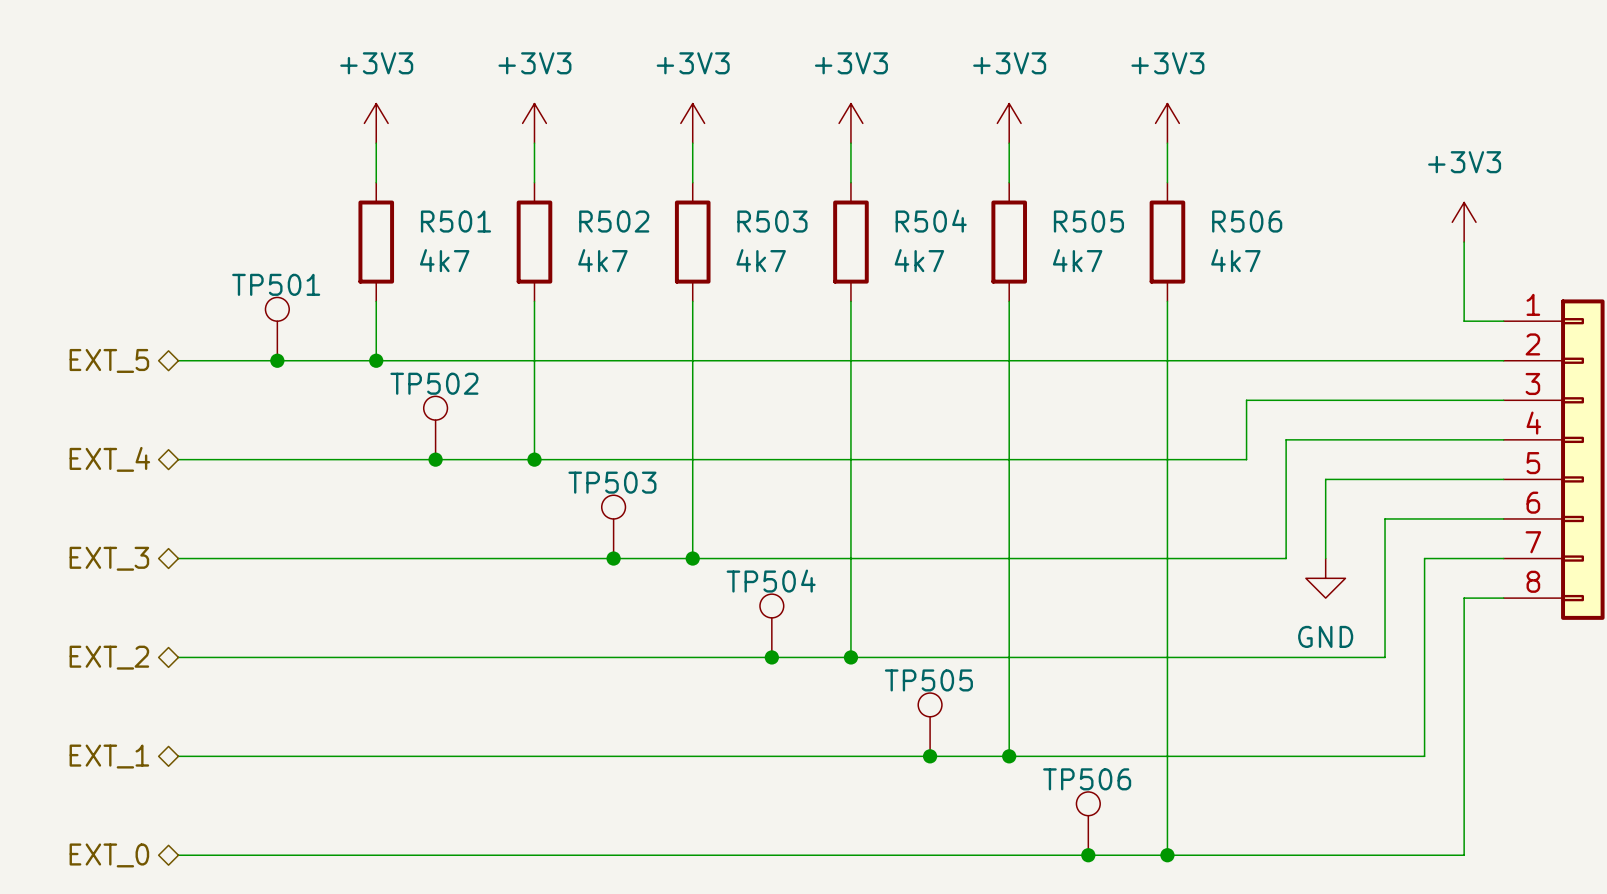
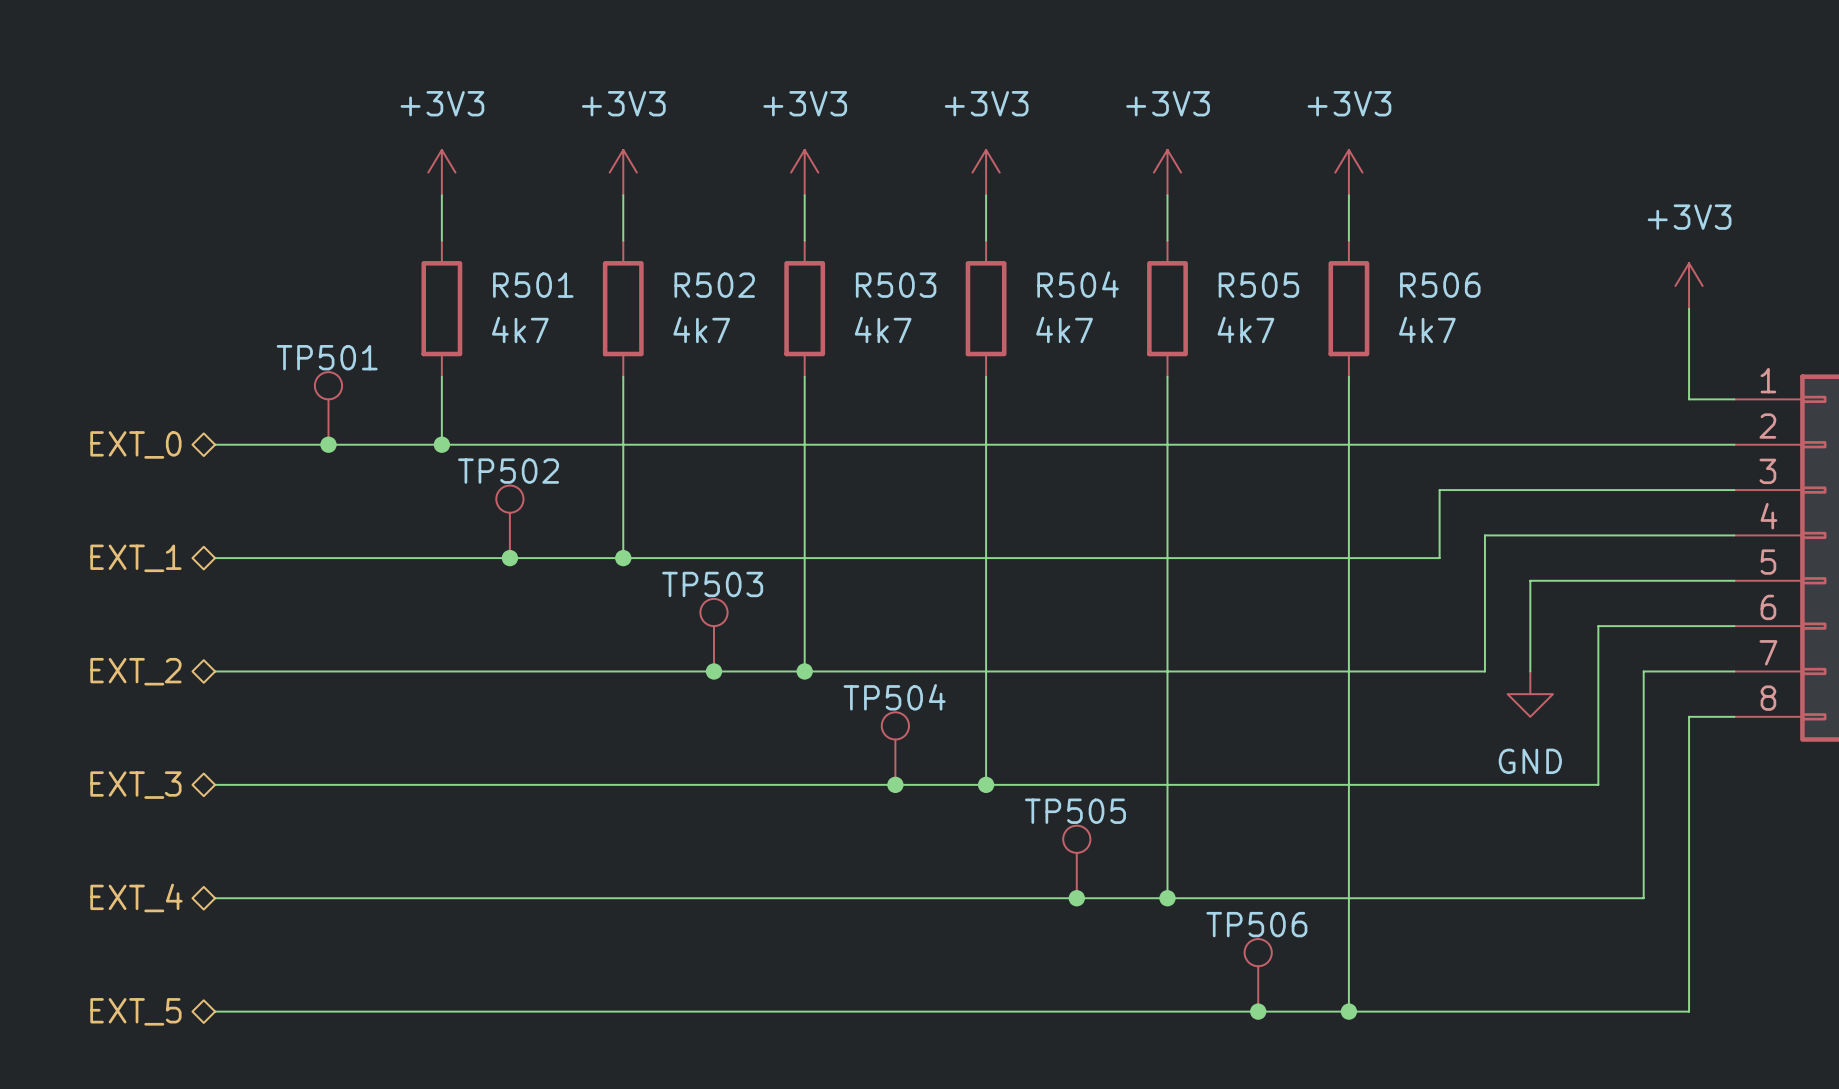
hierarchical label: EXT_5 (109, 360) -> EXT_0 (135, 444)
hierarchical label: EXT_4 (109, 459) -> EXT_1 (135, 558)
hierarchical label: EXT_3 (109, 558) -> EXT_2 (135, 671)
hierarchical label: EXT_2 (109, 657) -> EXT_3 (135, 785)
hierarchical label: EXT_1 (109, 756) -> EXT_4 (136, 897)
hierarchical label: EXT_0 (109, 855) -> EXT_5 (135, 1011)

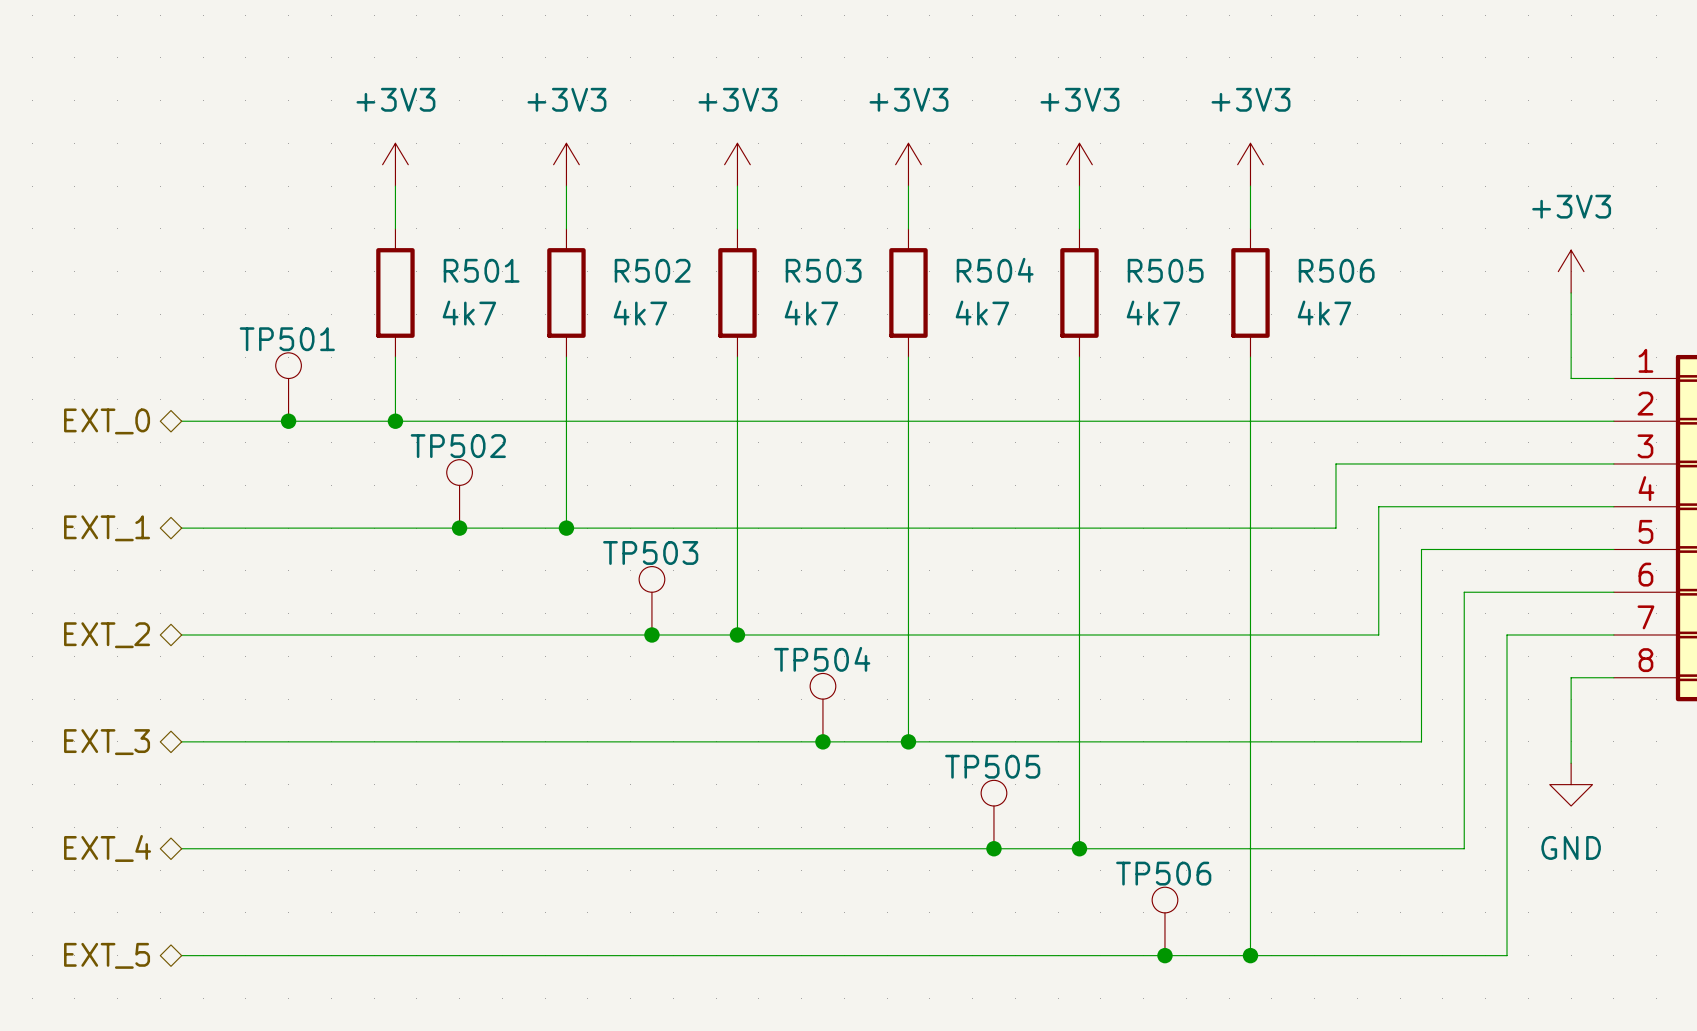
wire: (1598, 626) (1598, 784) (1530, 784) -> (1421, 634) (1421, 741)
wire: (1643, 671) (1643, 898) (1575, 898) -> (1485, 592) (1464, 592) (1464, 848)
power symbol position: GND (1530, 694) -> GND (1571, 784)
wire: (1689, 807) (1689, 1011) (1621, 1011) -> (1528, 634) (1507, 634) (1507, 955)

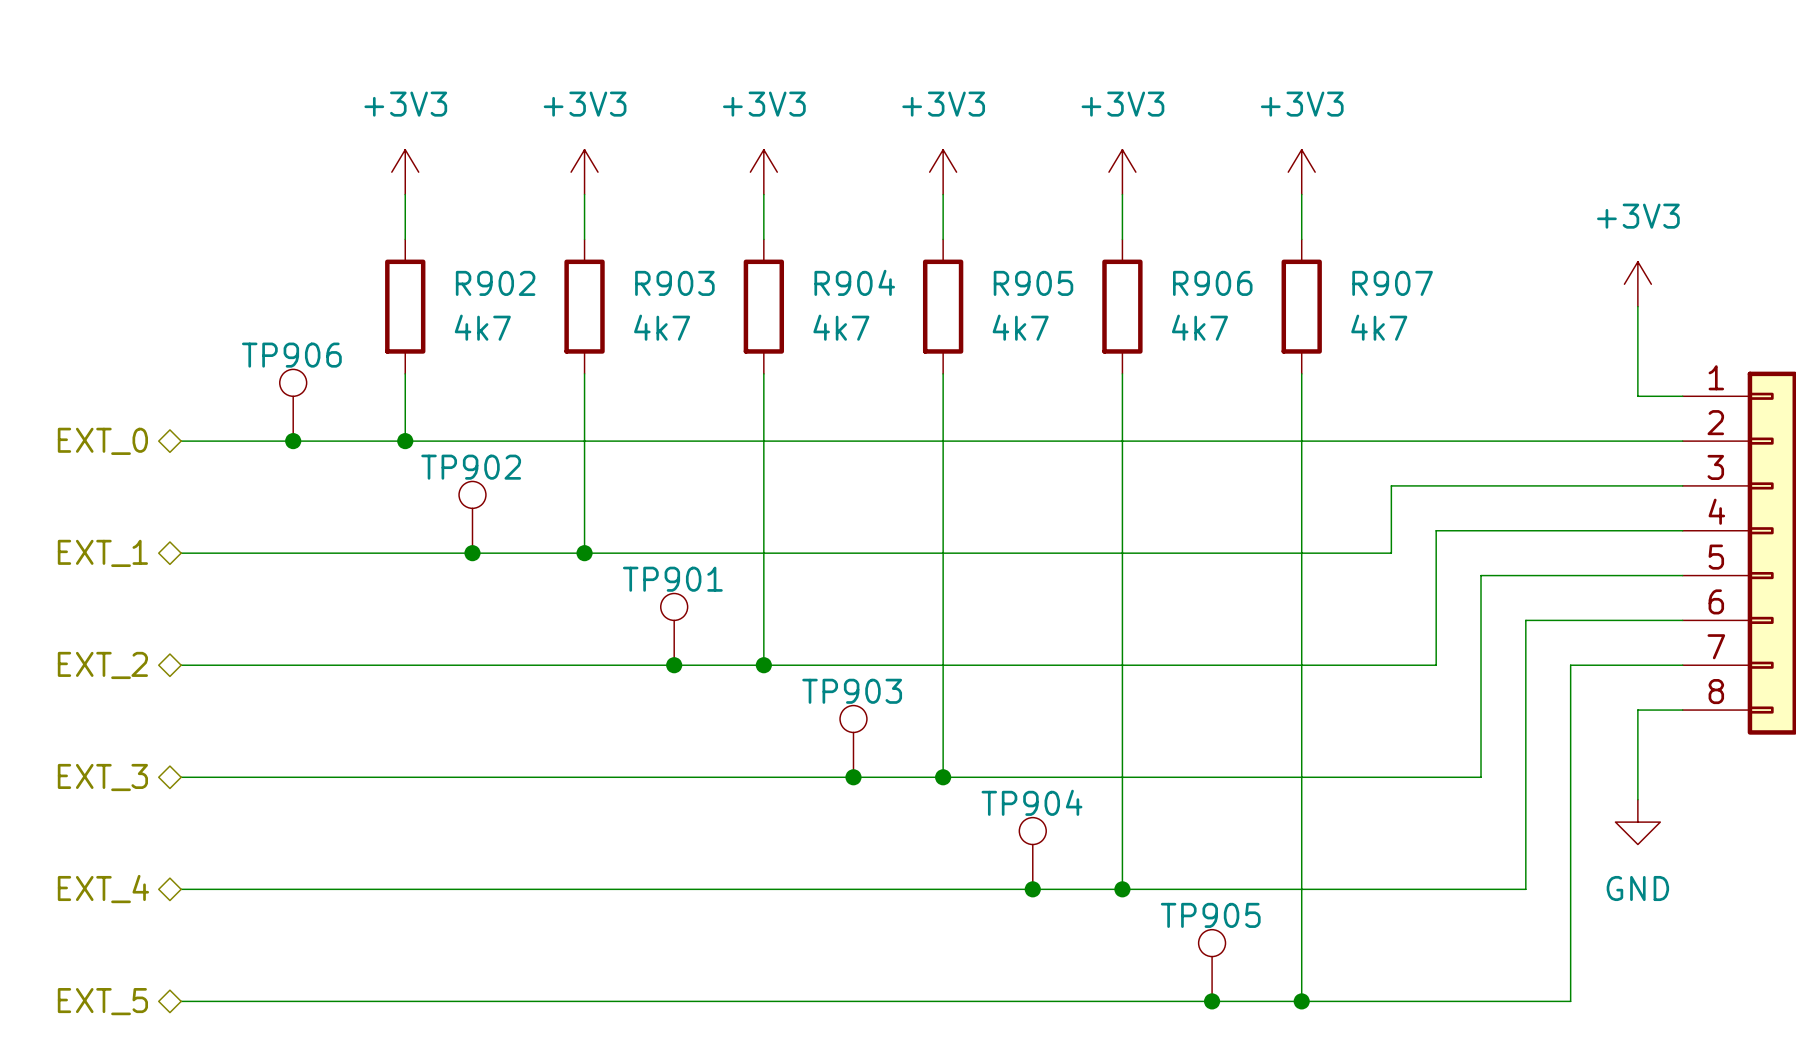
R501 name: R501 (481, 270) -> R902 (495, 283)
R502 name: R502 (652, 270) -> R903 (674, 283)
R503 name: R503 (823, 270) -> R904 (854, 282)
R504 name: R504 (995, 270) -> R905 (1033, 283)
R505 name: R505 (1165, 270) -> R906 (1212, 283)
R506 name: R506 (1336, 270) -> R907 (1392, 283)
TP501 name: TP501 (287, 339) -> TP906 (291, 355)
TP502 name: TP502 (458, 446) -> TP902 (471, 467)
TP503 name: TP503 (650, 552) -> TP901 (672, 579)
TP504 name: TP504 (822, 659) -> TP903 (852, 691)
TP505 name: TP505 (992, 766) -> TP904 (1031, 802)
TP506 name: TP506 (1163, 873) -> TP905 (1210, 915)

